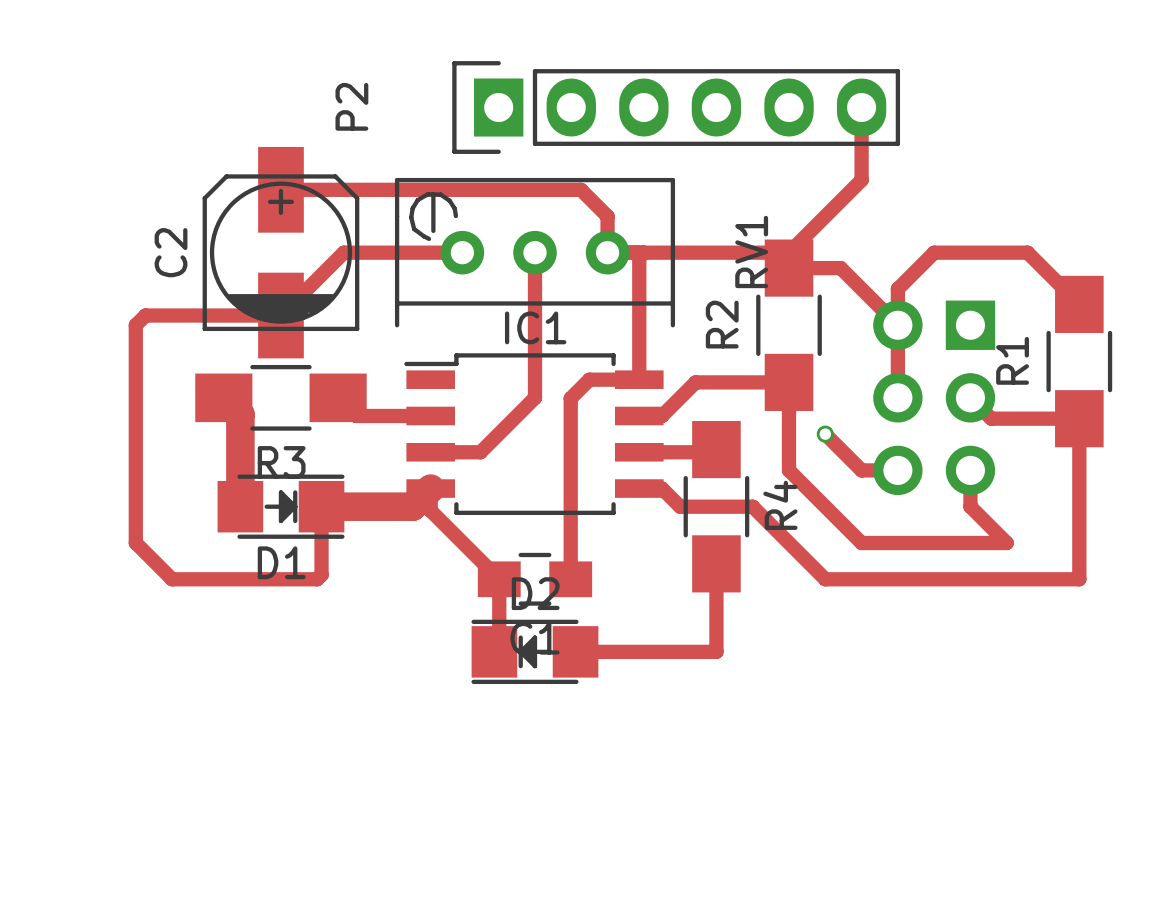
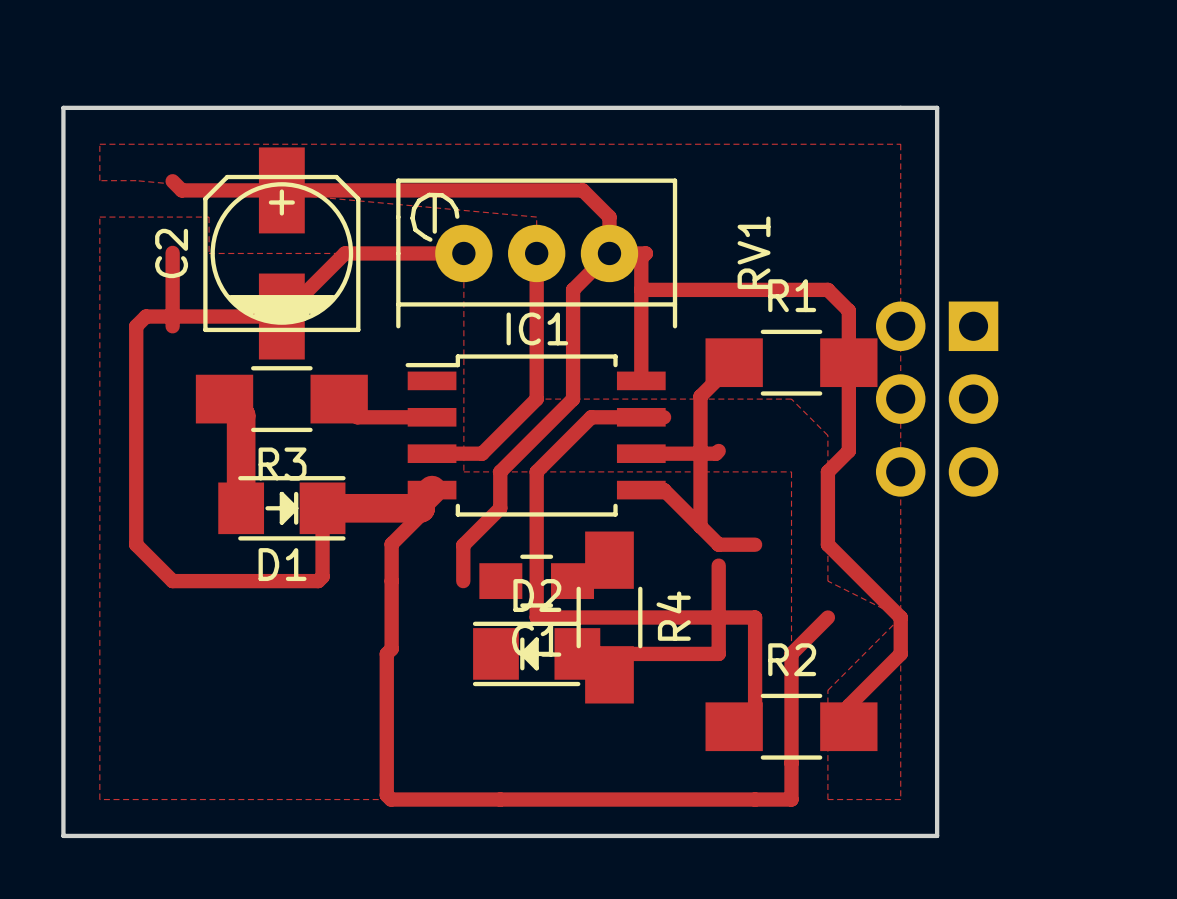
board edge: none -> (63, 107) (63, 835) (937, 835) (937, 107) (63, 107)
P2: (676, 107) -> none
top track: (861, 107) (861, 180) (789, 252) (789, 268) -> none
top zone outline: none -> (99, 144) (99, 180) (136, 180) (536, 217) (536, 399) (791, 399) (827, 435) (827, 581) (900, 617) (827, 690) (827, 799) (900, 799) (900, 144) (99, 144)
RV1 footprint: [394, 177, 676, 328] -> [396, 178, 678, 329]
top track: none -> (172, 181) (181, 190) (281, 190)
top zone outline: none -> (99, 217) (99, 799) (791, 799) (791, 471) (463, 471) (463, 253) (209, 253) (209, 217) (99, 217)
top track: none -> (172, 252) (172, 326)
top track: (643, 252) (773, 252) (789, 268) -> none
top track: (789, 268) (840, 268) (897, 325) -> none
top track: none -> (641, 289) (827, 289) (848, 310) (848, 450) (827, 471) (827, 544) (900, 617) (900, 653) (848, 705) (848, 726)
top track: (1079, 304) (1027, 252) (934, 252) (897, 288) (897, 397) -> none
R2 rotation: 0° (789, 325) -> 90° clockwise (791, 726)
R2 position: (789, 325) -> (791, 726)
top track: none -> (734, 362) (700, 396) (700, 526)
R1 rotation: 0° (1079, 361) -> 90° clockwise (791, 362)
R1 position: (1079, 361) -> (791, 362)
top track: (639, 379) (589, 379) (571, 397) -> (609, 253) (573, 289) (573, 399)
top track: (970, 397) (991, 418) (1079, 418) (1079, 579) (825, 579) (752, 506) (680, 506) -> (755, 544) (718, 544) (682, 508)
top track: (570, 398) (570, 579) -> (572, 399) (500, 471) (500, 508) (463, 545) (463, 581)
top track: none -> (641, 417) (591, 417) (536, 471) (536, 617) (755, 617) (755, 705) (734, 726)
top track: (662, 415) (695, 382) (789, 382) (789, 470) (861, 542) (1006, 542) (970, 506) (970, 470) -> none
top track: (825, 434) (861, 470) (897, 470) -> none
via: (825, 434) -> none
top track: (430, 488) (430, 510) (499, 579) (499, 647) (494, 651) -> none
top track: none -> (413, 508) (420, 508) (420, 515) (391, 544) (391, 649) (386, 653) (386, 795) (391, 799) (791, 799) (791, 653) (827, 617)
R4 position: (716, 506) -> (609, 617)

